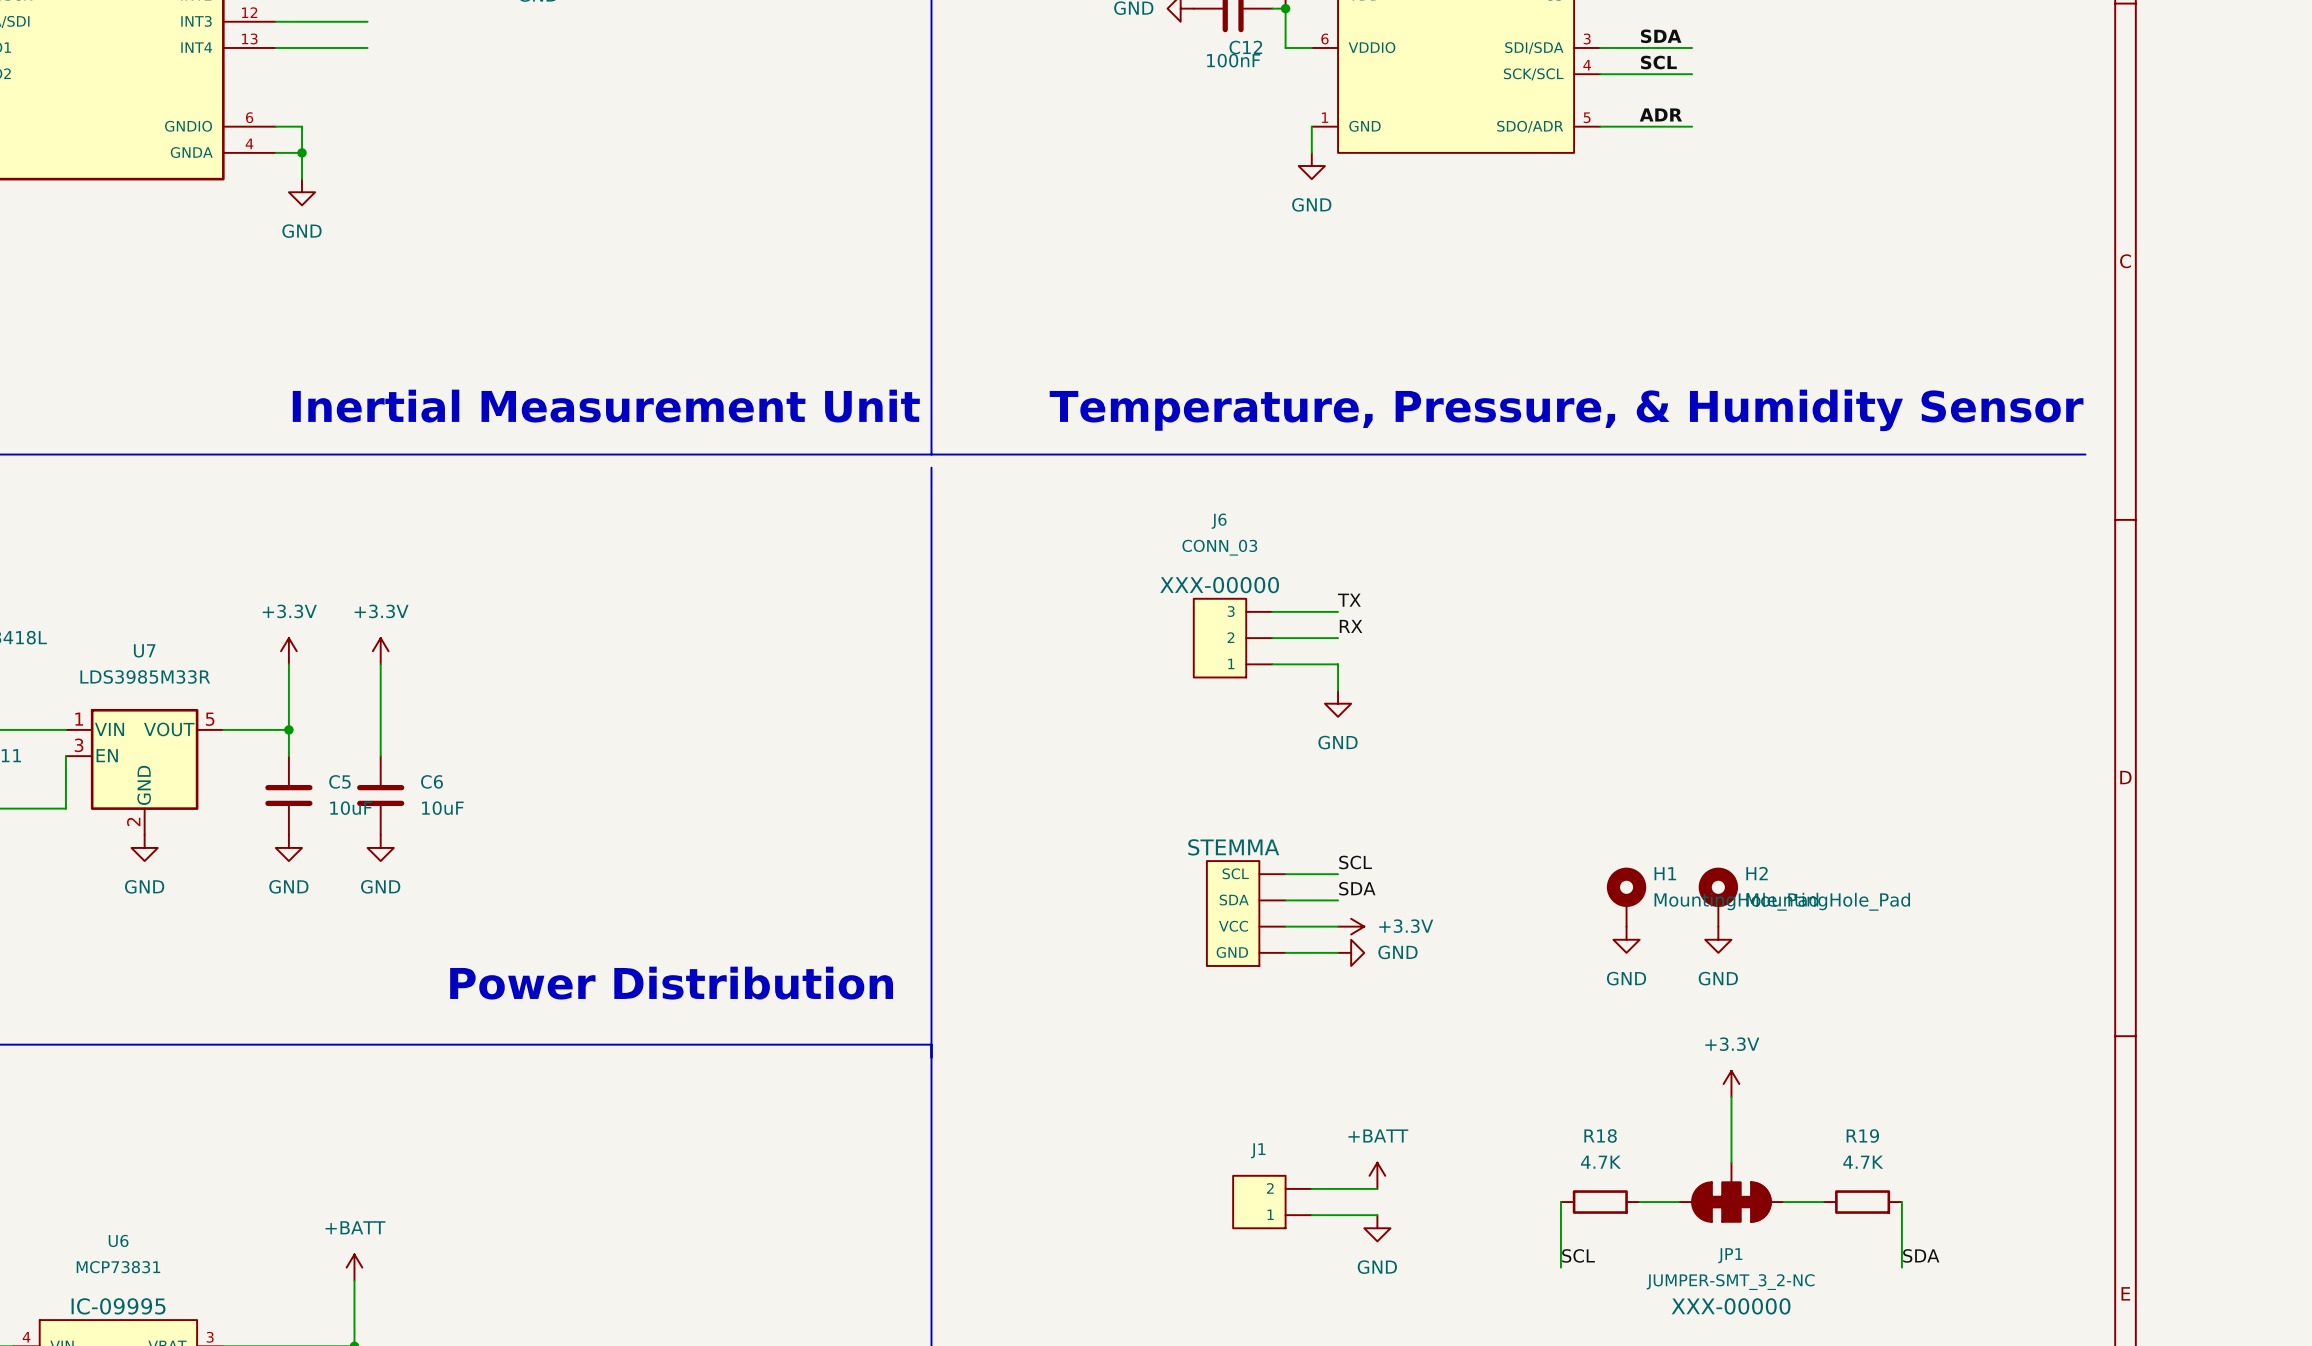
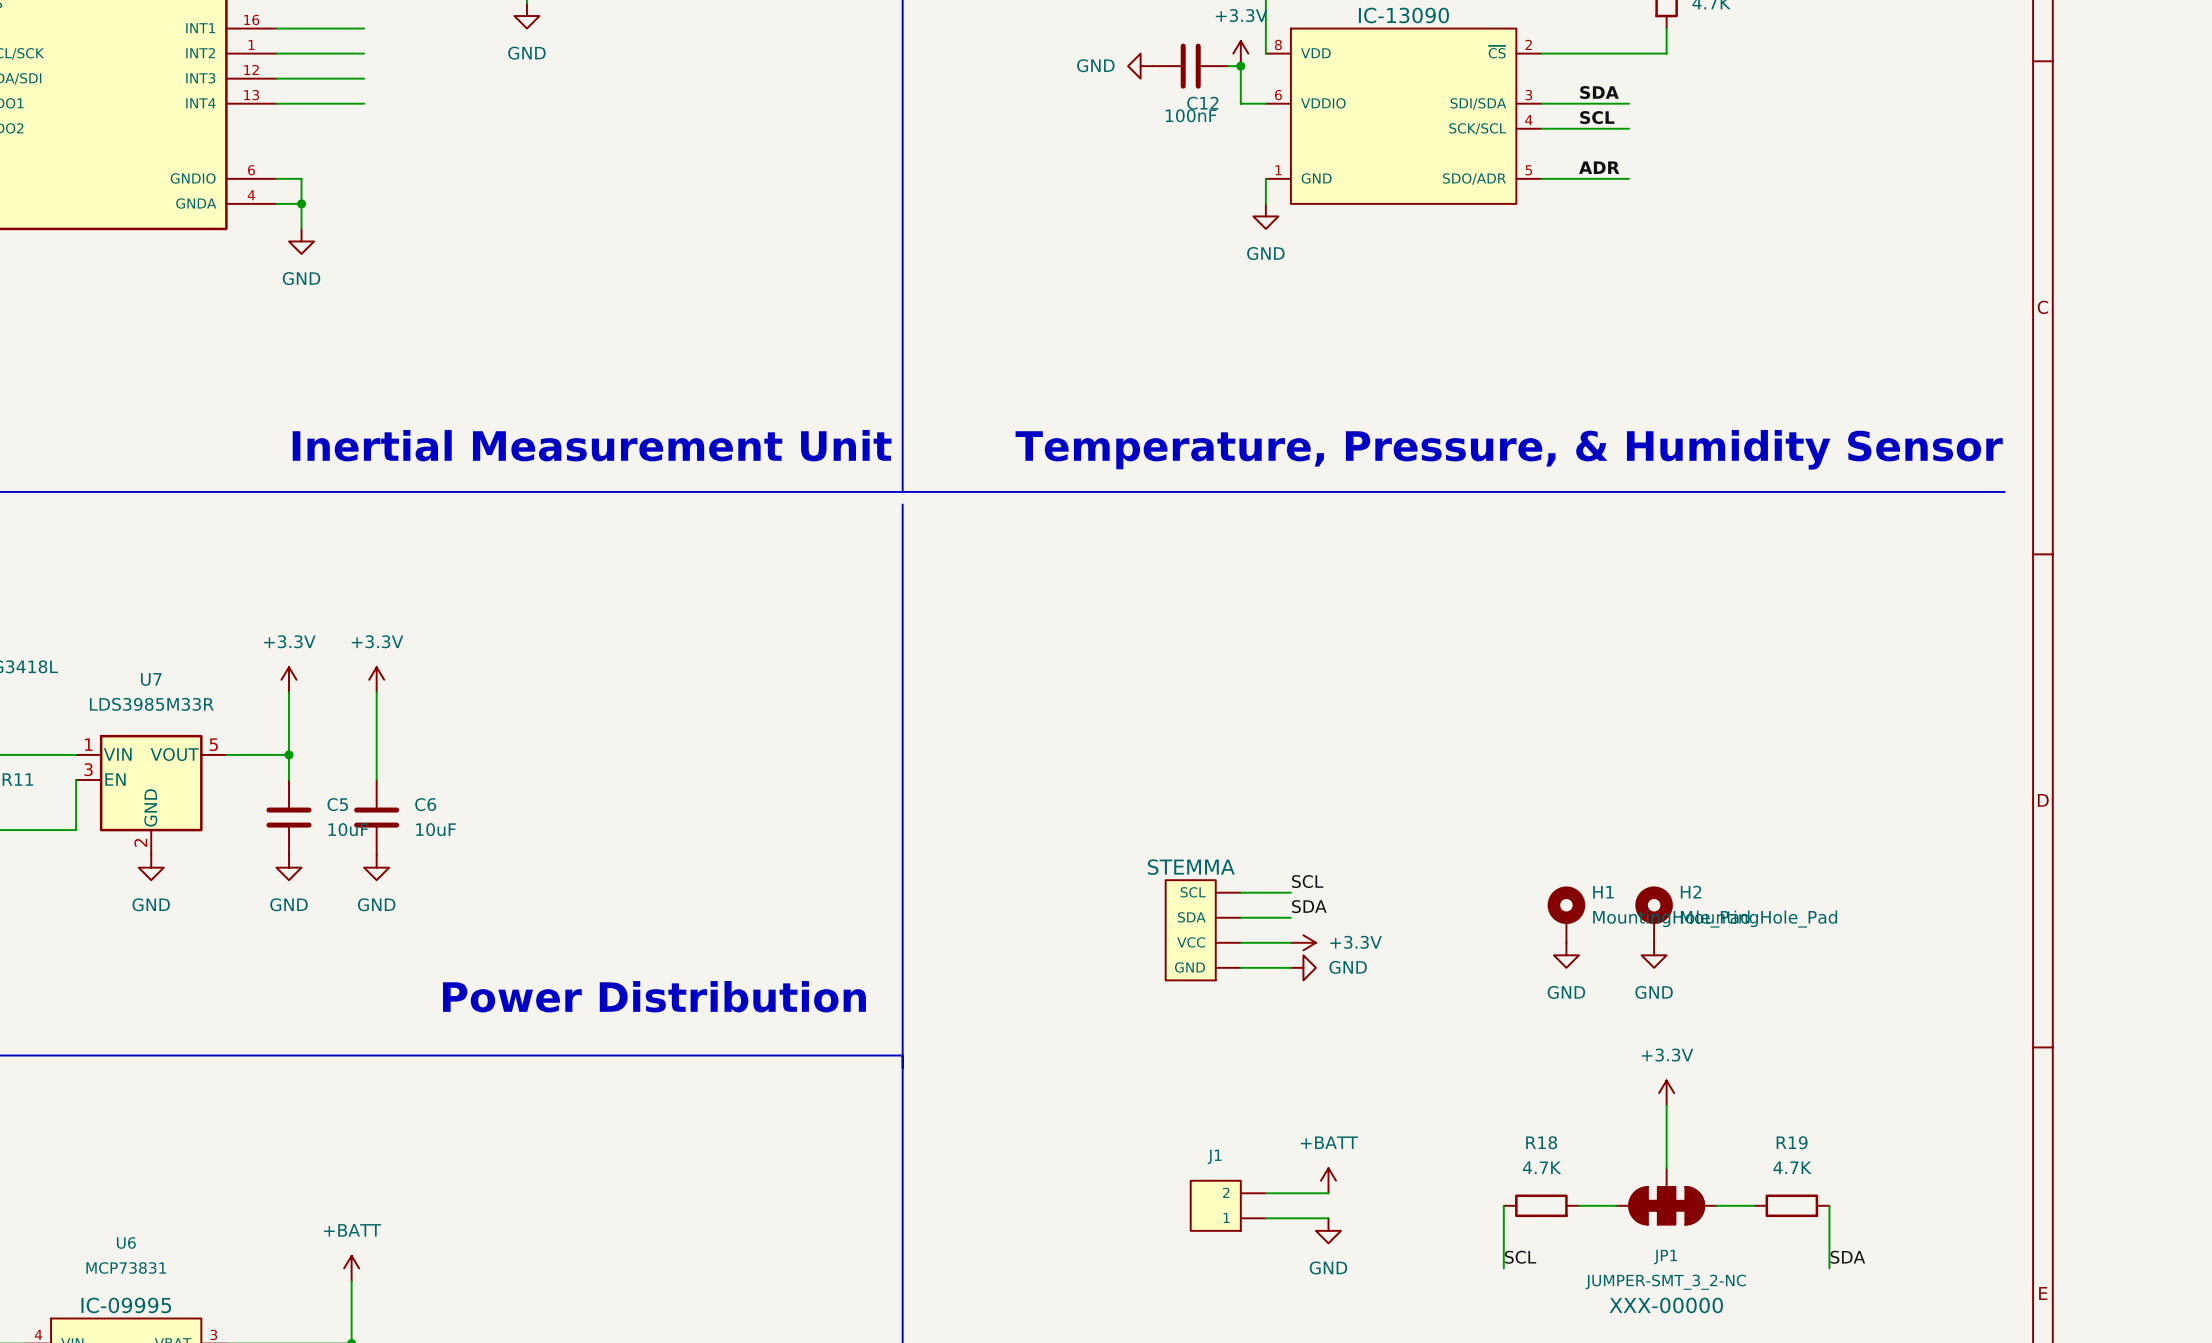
label: TX (1349, 600) -> none
wire: (1272, 611) (1338, 611) -> none
label: RX (1351, 626) -> none
J6: CONN_03 (1233, 638) -> none
wire: (1272, 638) (1338, 638) -> none
wire: (1272, 664) (1338, 664) (1338, 690) -> none
power symbol: GND (1338, 703) -> none

